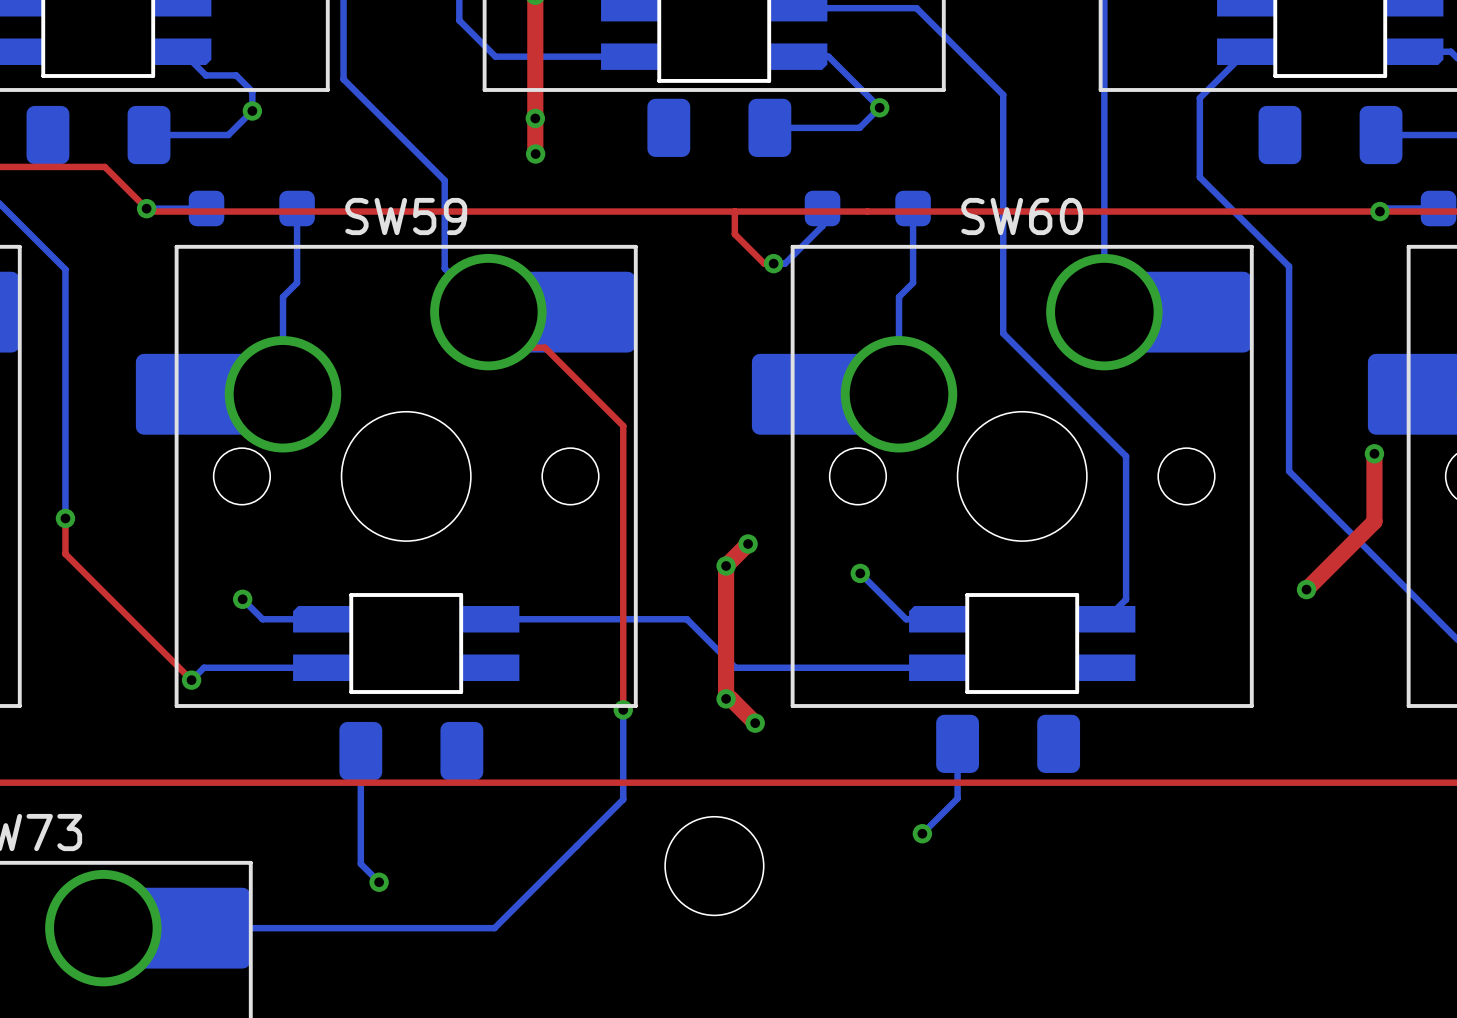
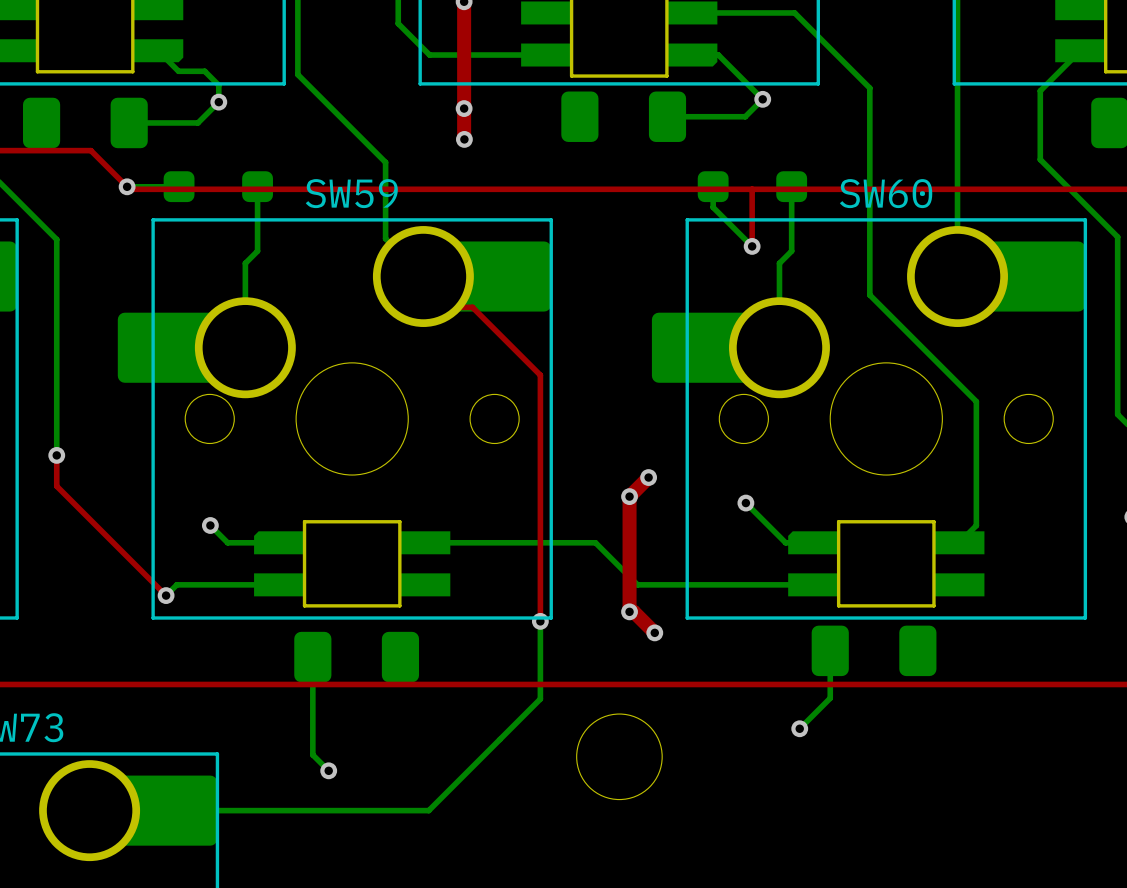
top track: (734, 211) (734, 234) (764, 263) (773, 263) -> none
top track: none -> (752, 189) (752, 246)
bottom track: (822, 226) (784, 263) (773, 263) -> (713, 201) (713, 207) (752, 246)
via position: (773, 263) -> (752, 246)

